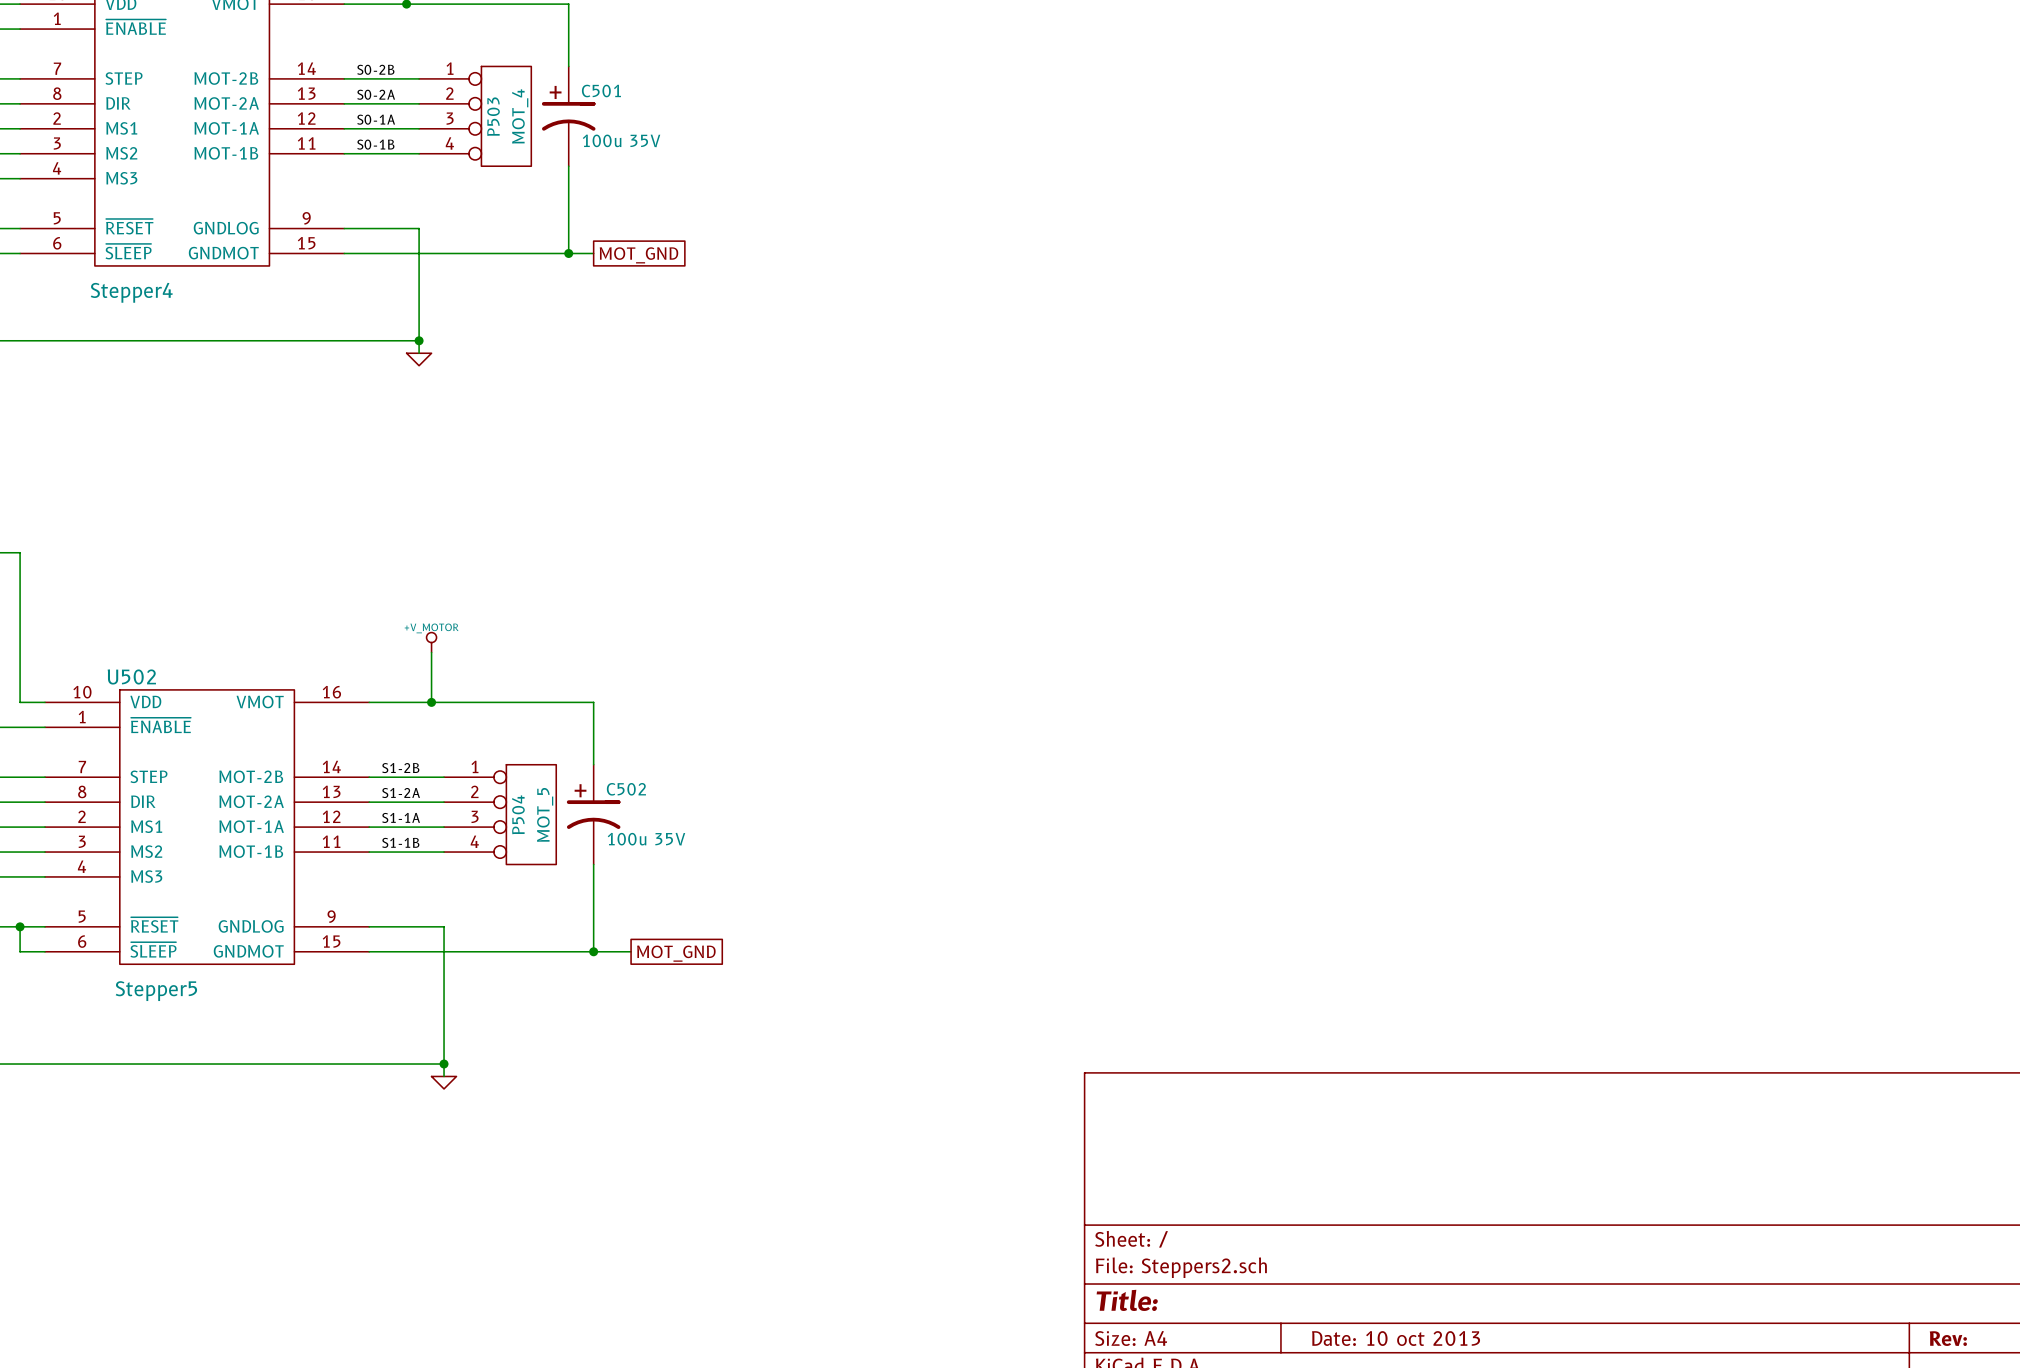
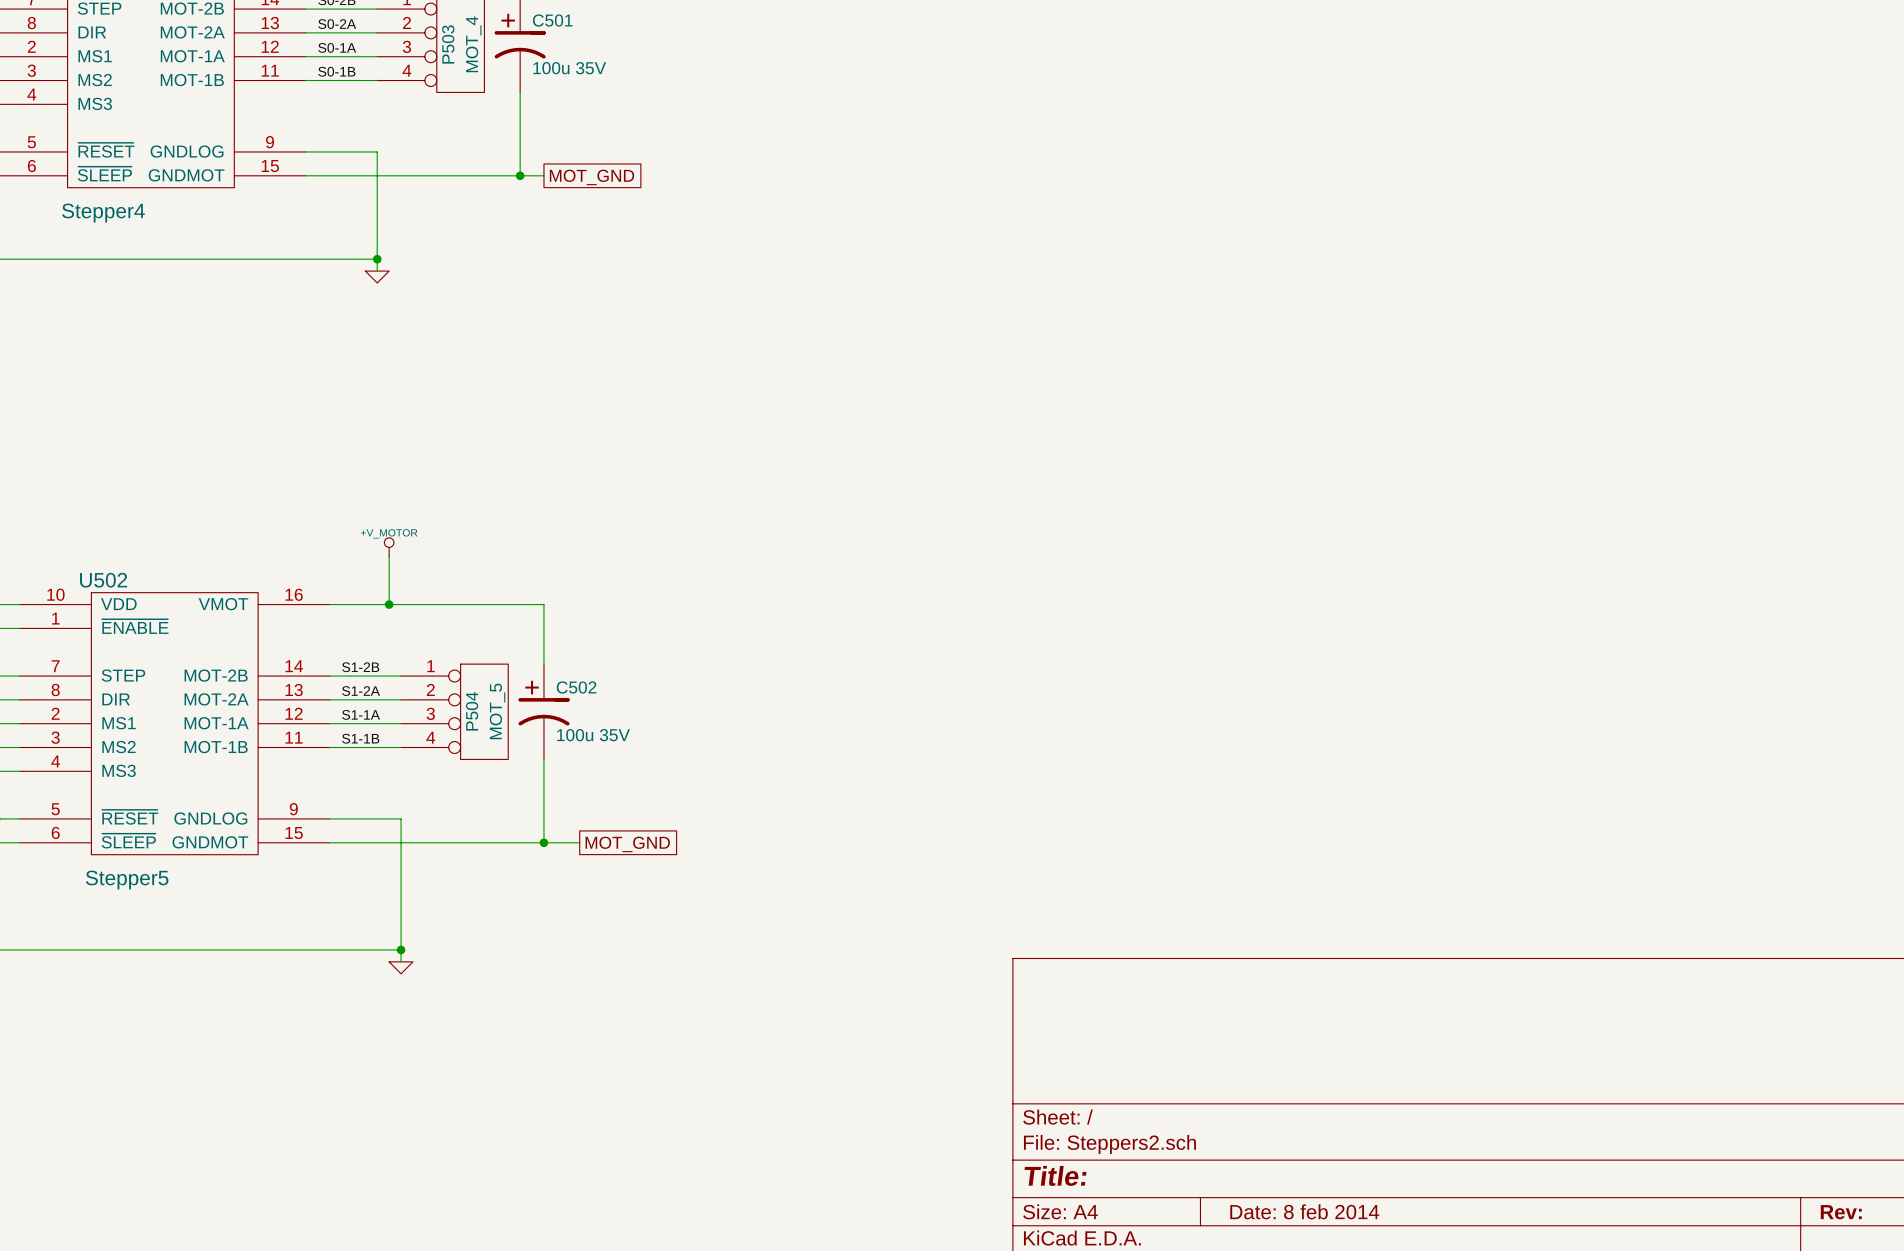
title block: Date: 10 oct 2013 (1396, 1338) -> Date: 8 feb 2014 (1304, 1211)

